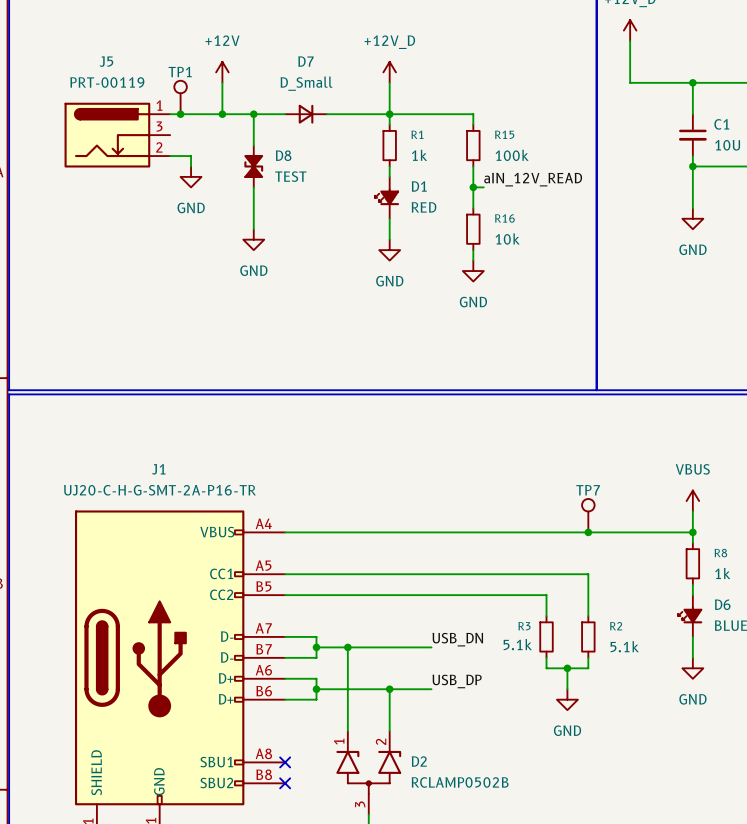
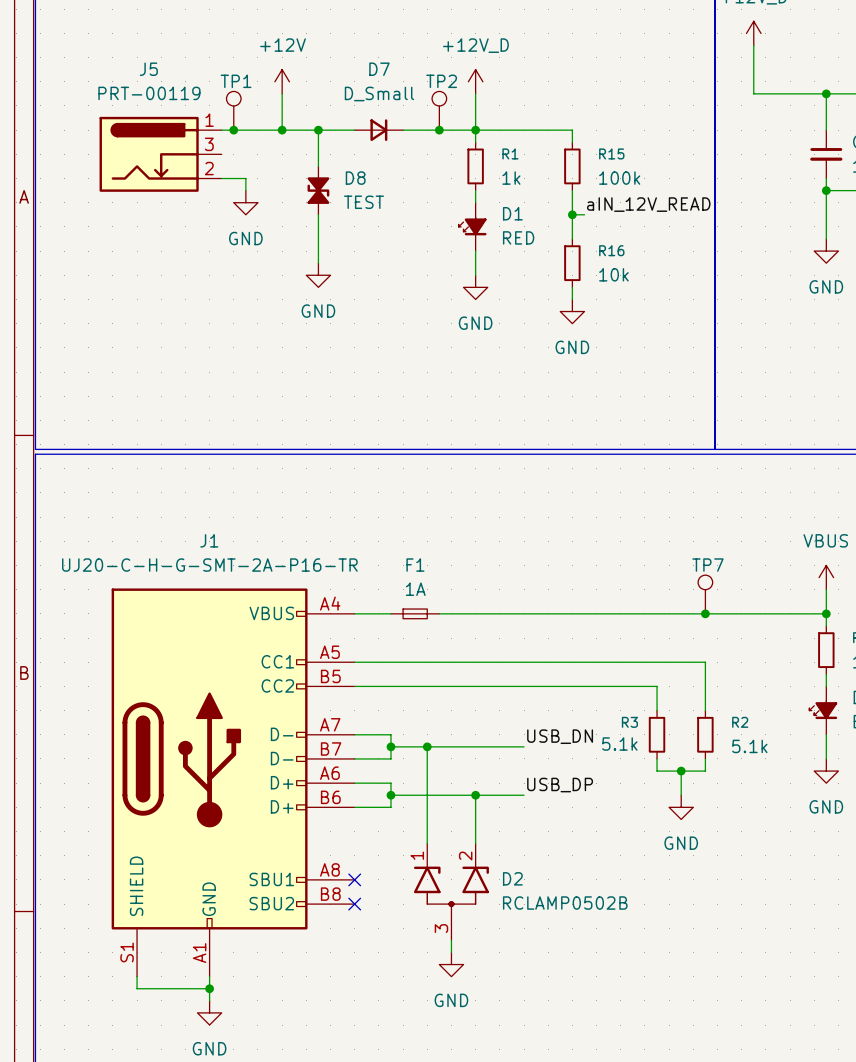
TP2: none -> (439, 110)
junction: none -> (439, 130)
F1: none -> 1A (415, 613)

